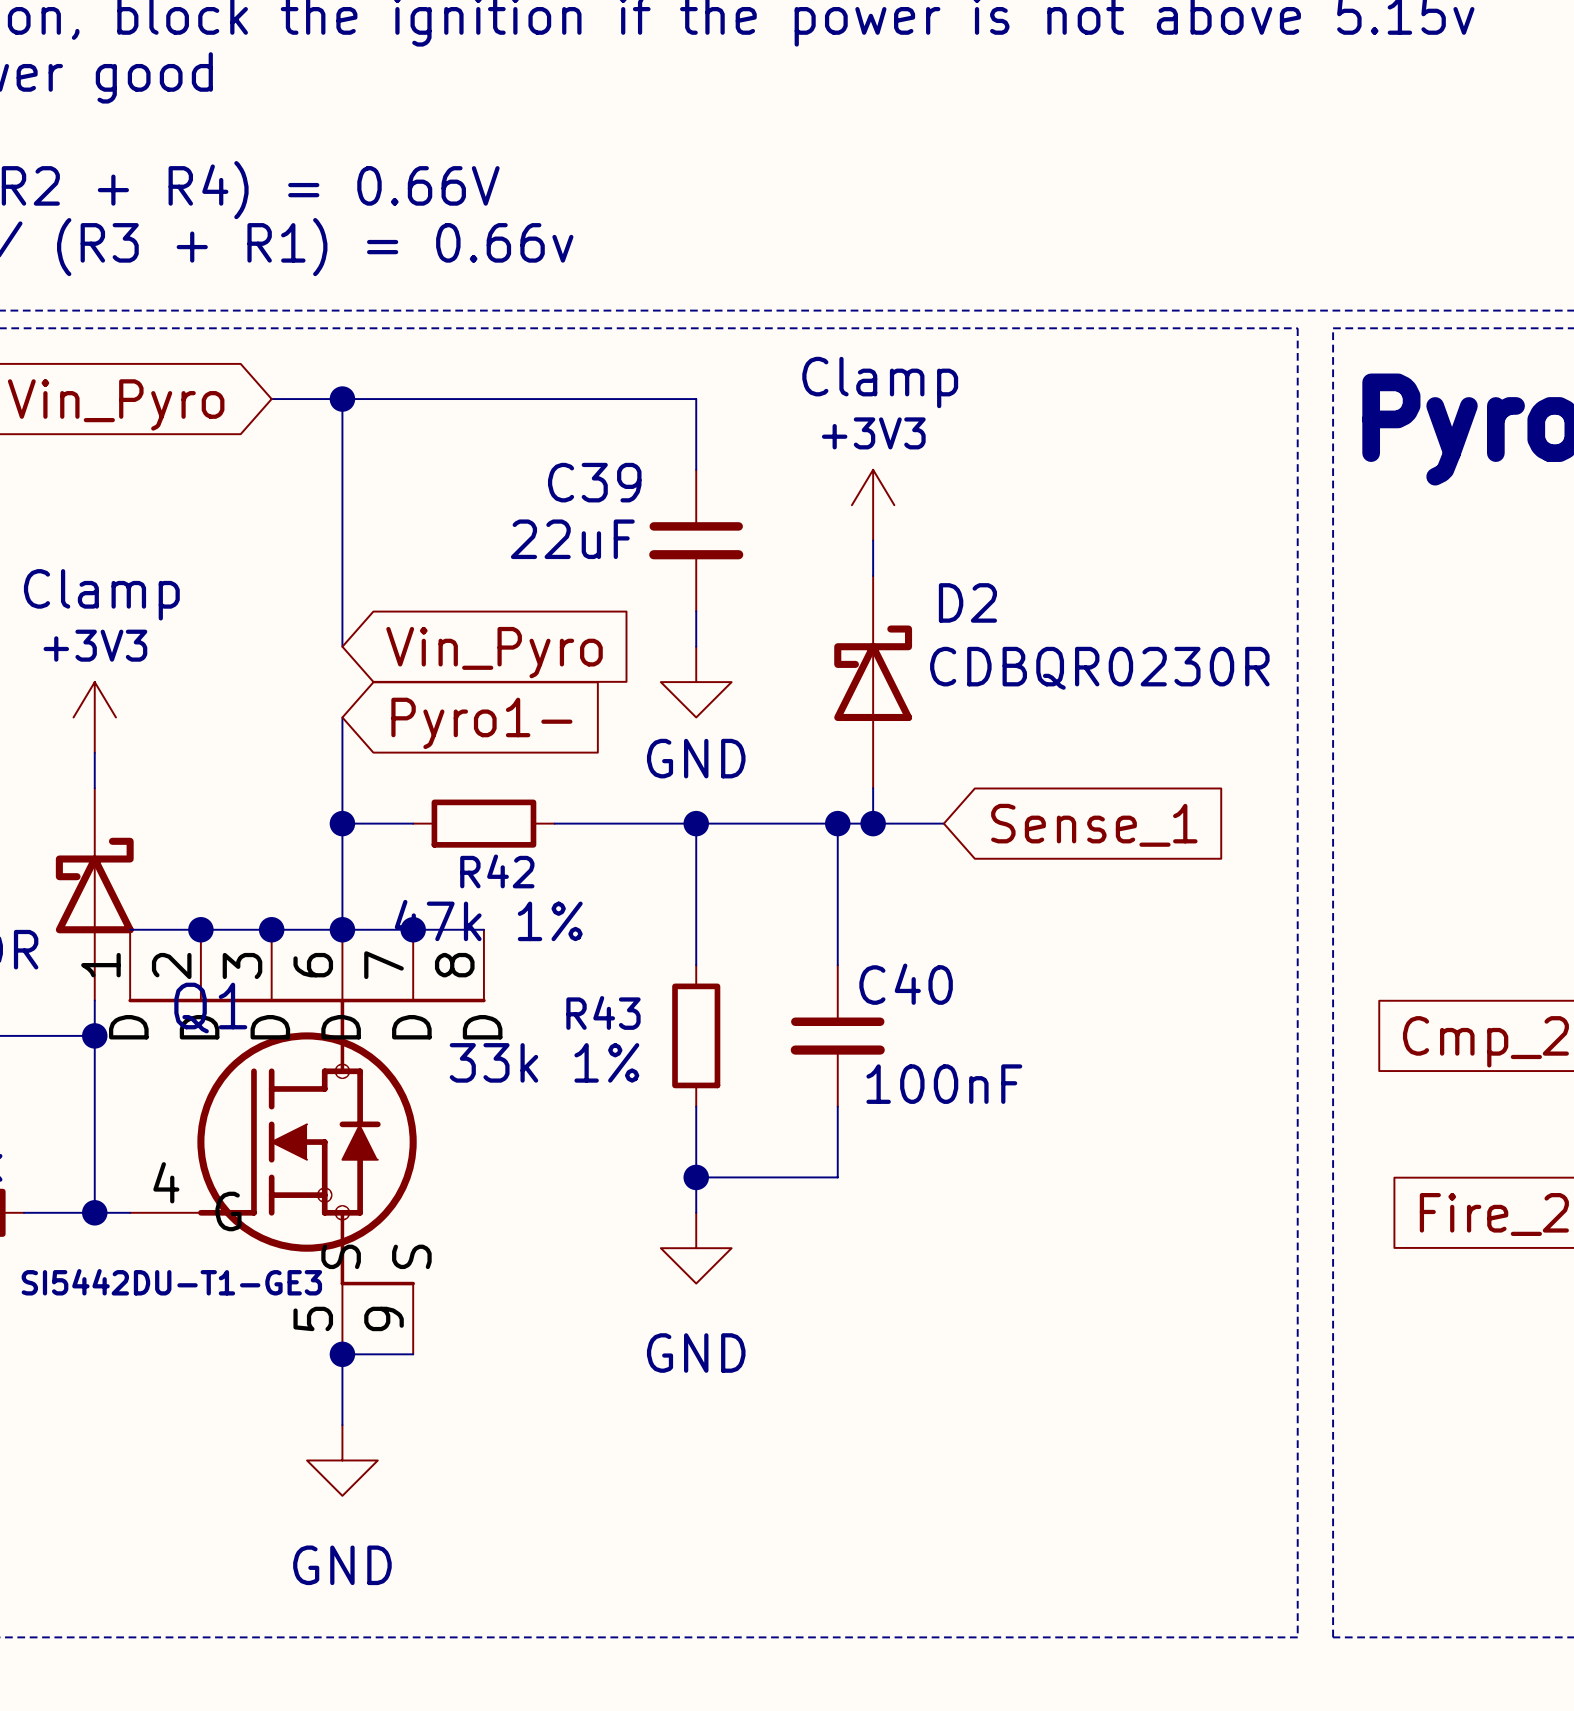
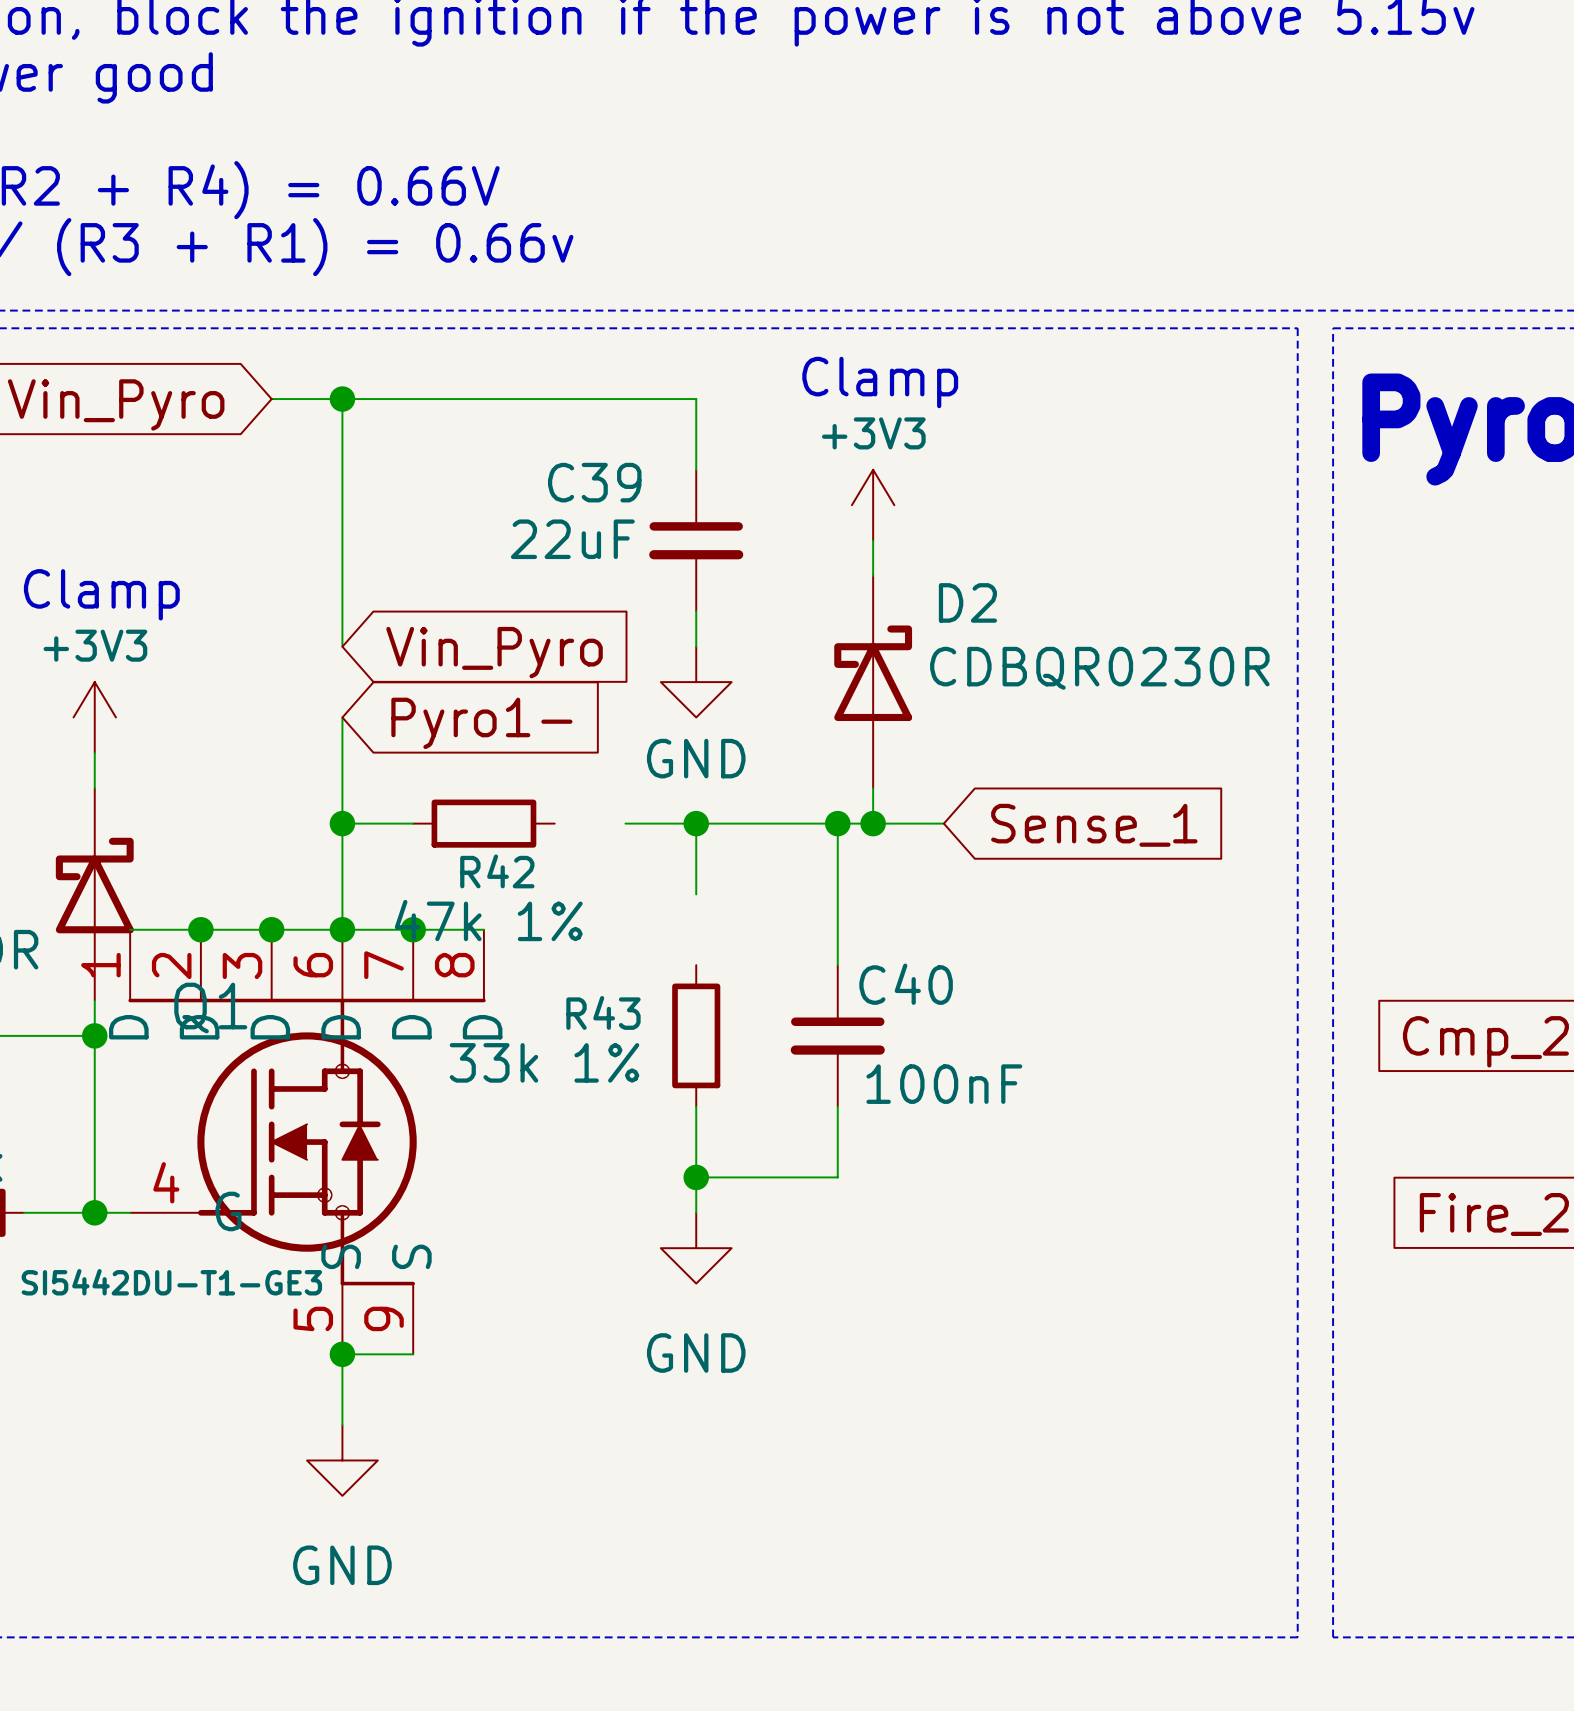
wire: (554, 823) (625, 823) -> none
wire: (696, 894) (696, 965) -> none

